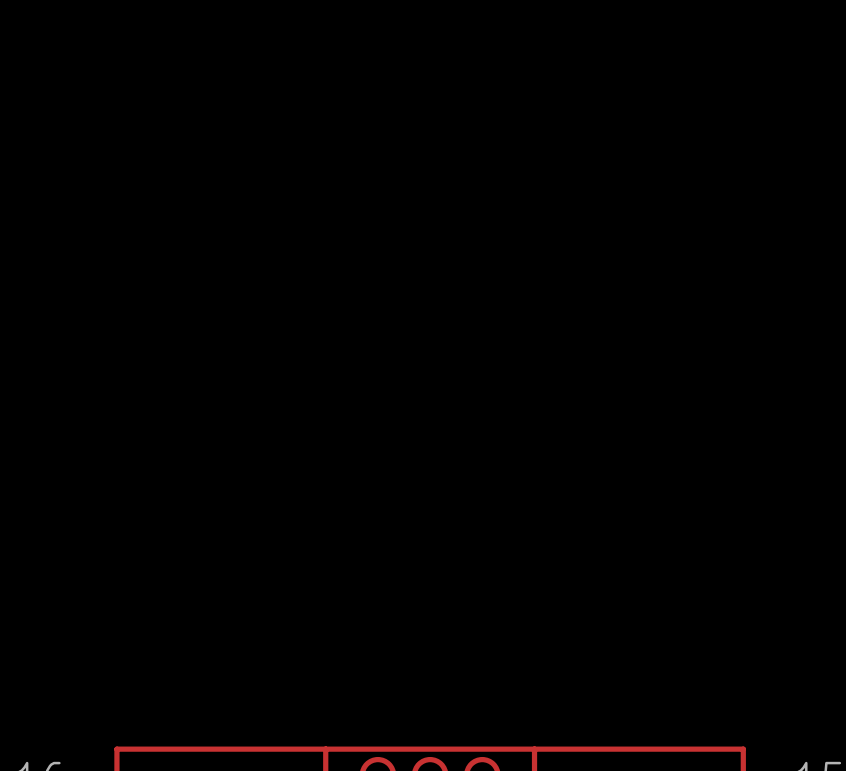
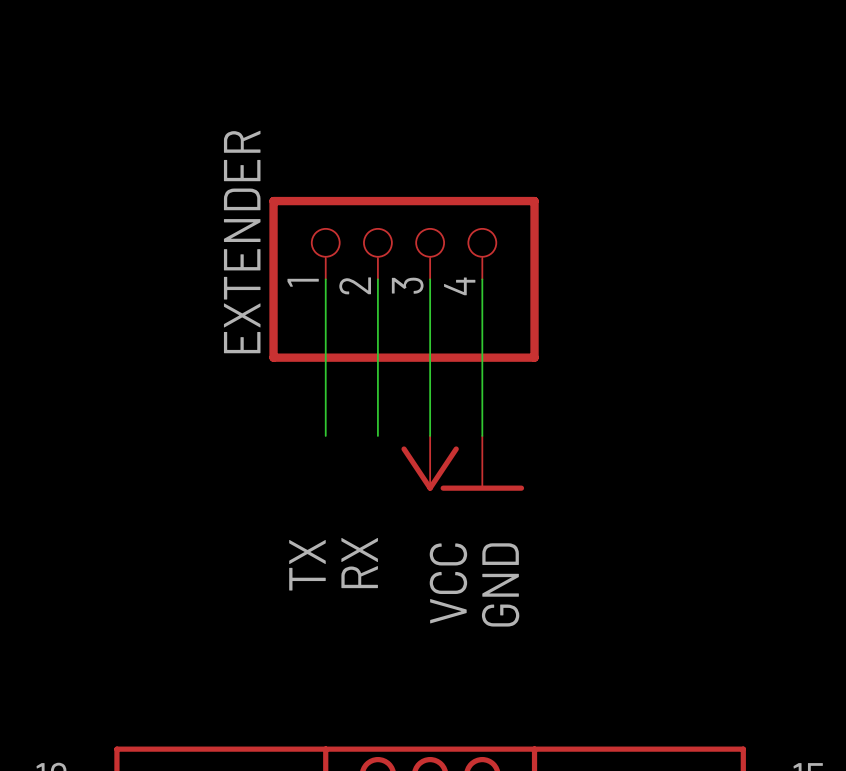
wire: none -> (325, 279) (325, 435)
wire: none -> (377, 279) (377, 435)
EXTENDER: none -> (404, 279)
wire: none -> (430, 279) (430, 435)
wire: none -> (482, 279) (482, 435)
power symbol: none -> VCC (430, 463)
power symbol: none -> GND (482, 463)
label: none -> RX (359, 563)
label: none -> TX (307, 565)

